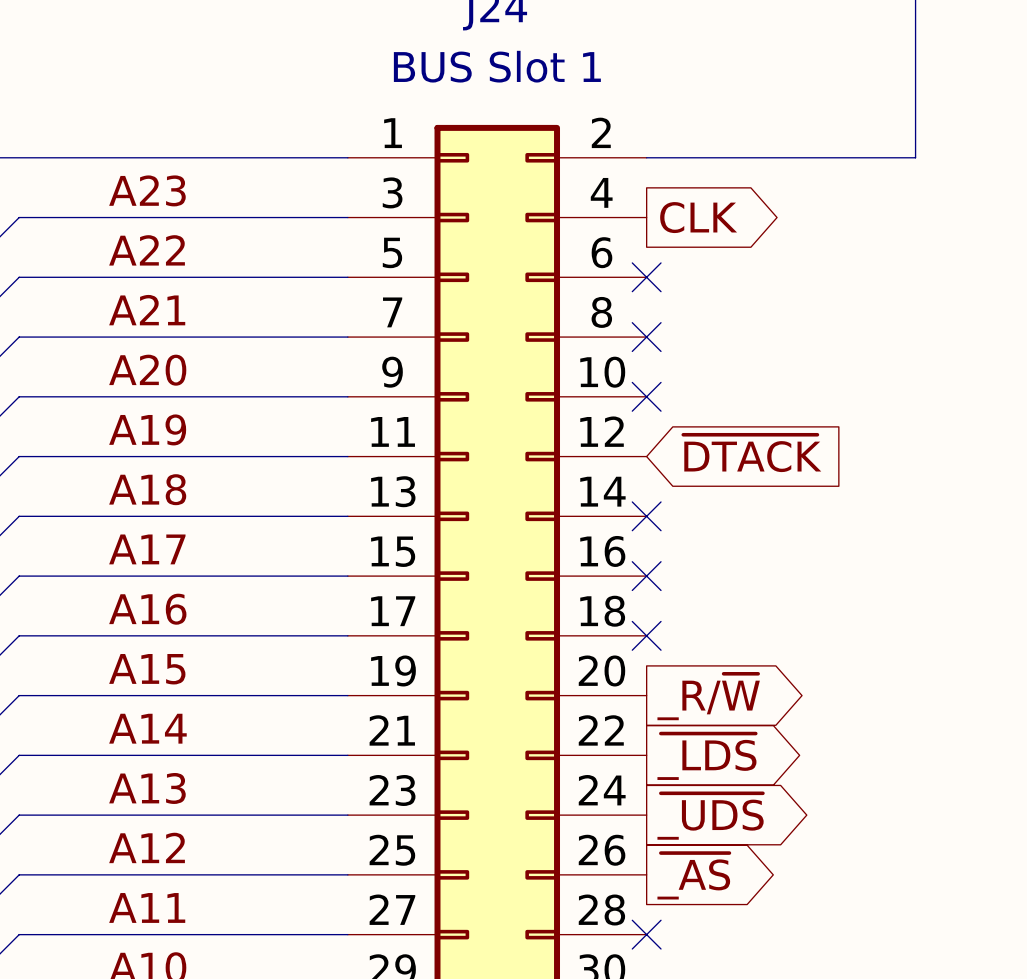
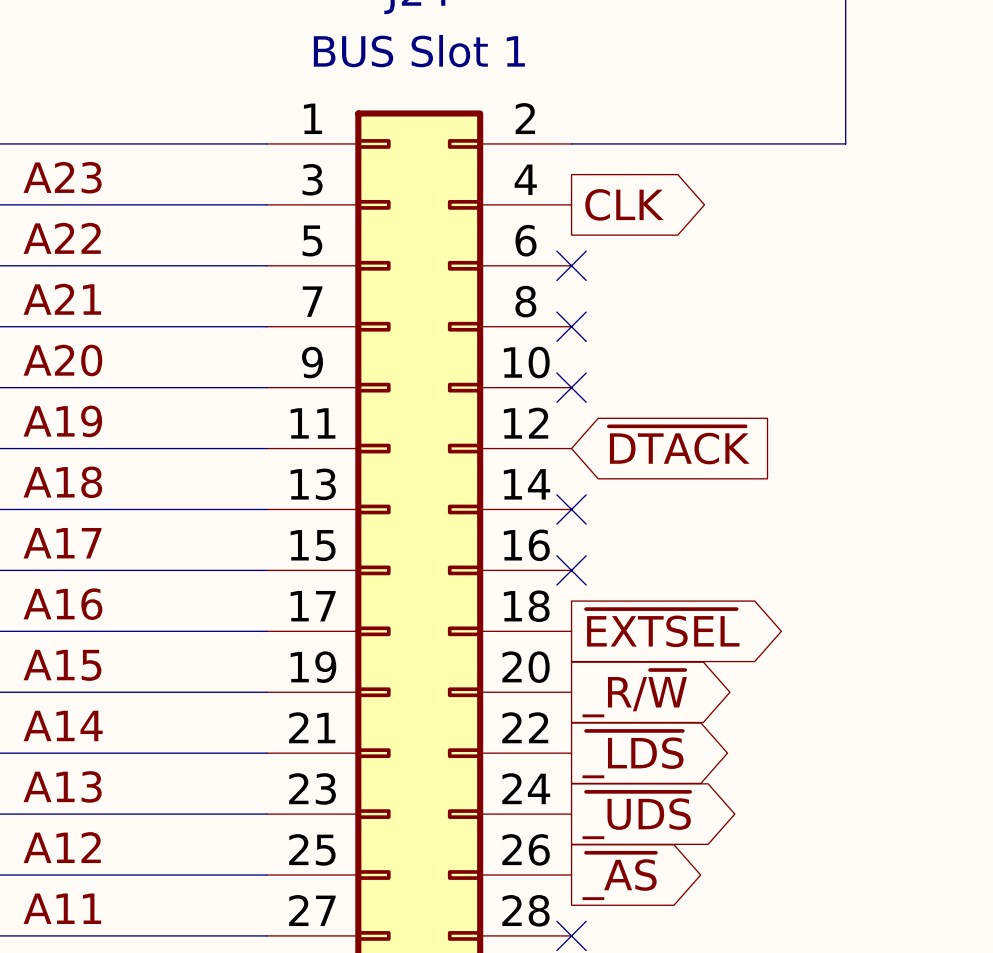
global label: none -> ~{EXTSEL} (662, 628)
no-connect mark: (646, 635) -> none

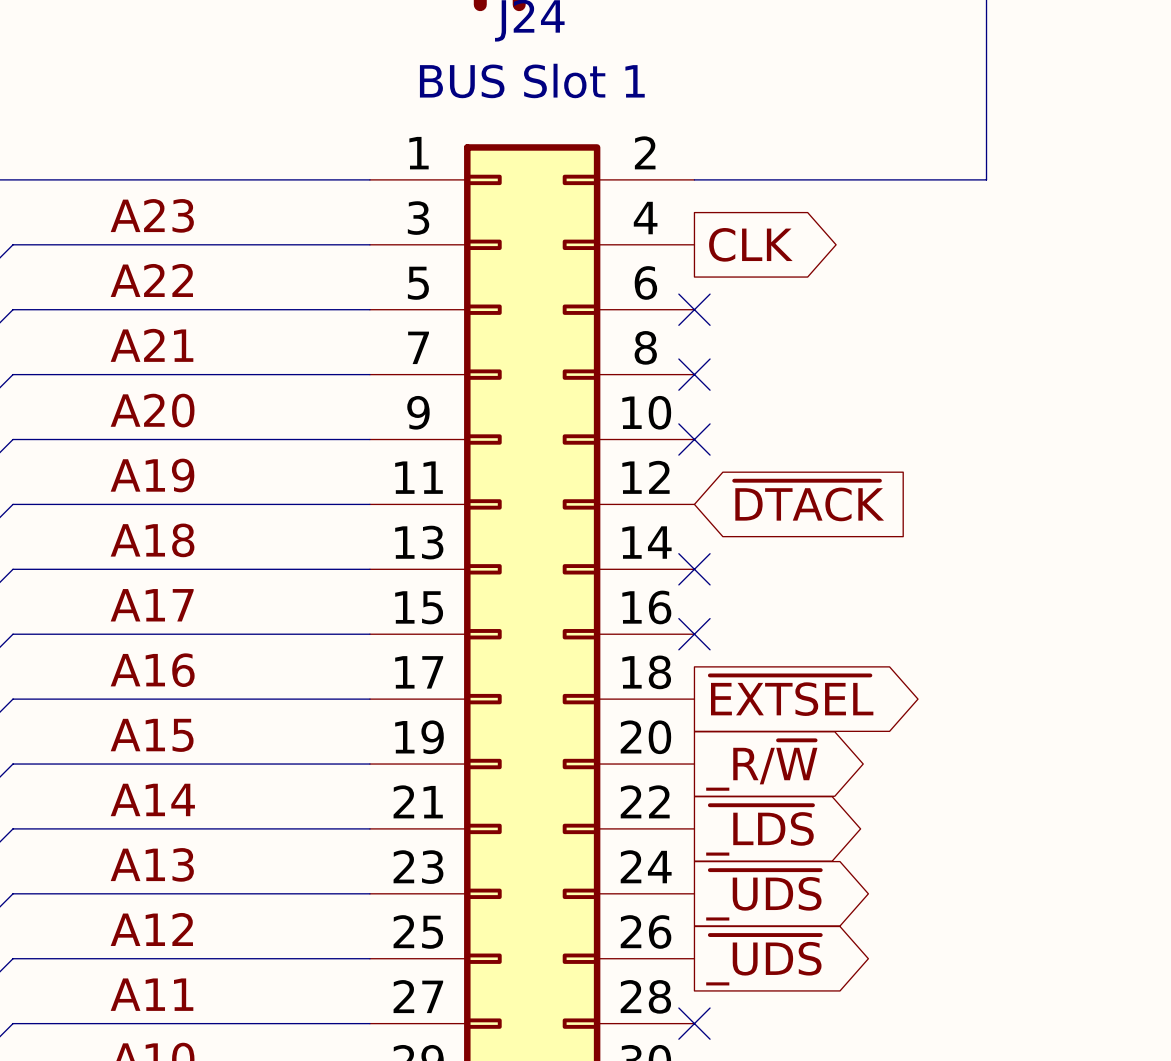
global label: ~{_AS} (619, 876) -> ~{_UDS} (763, 960)

